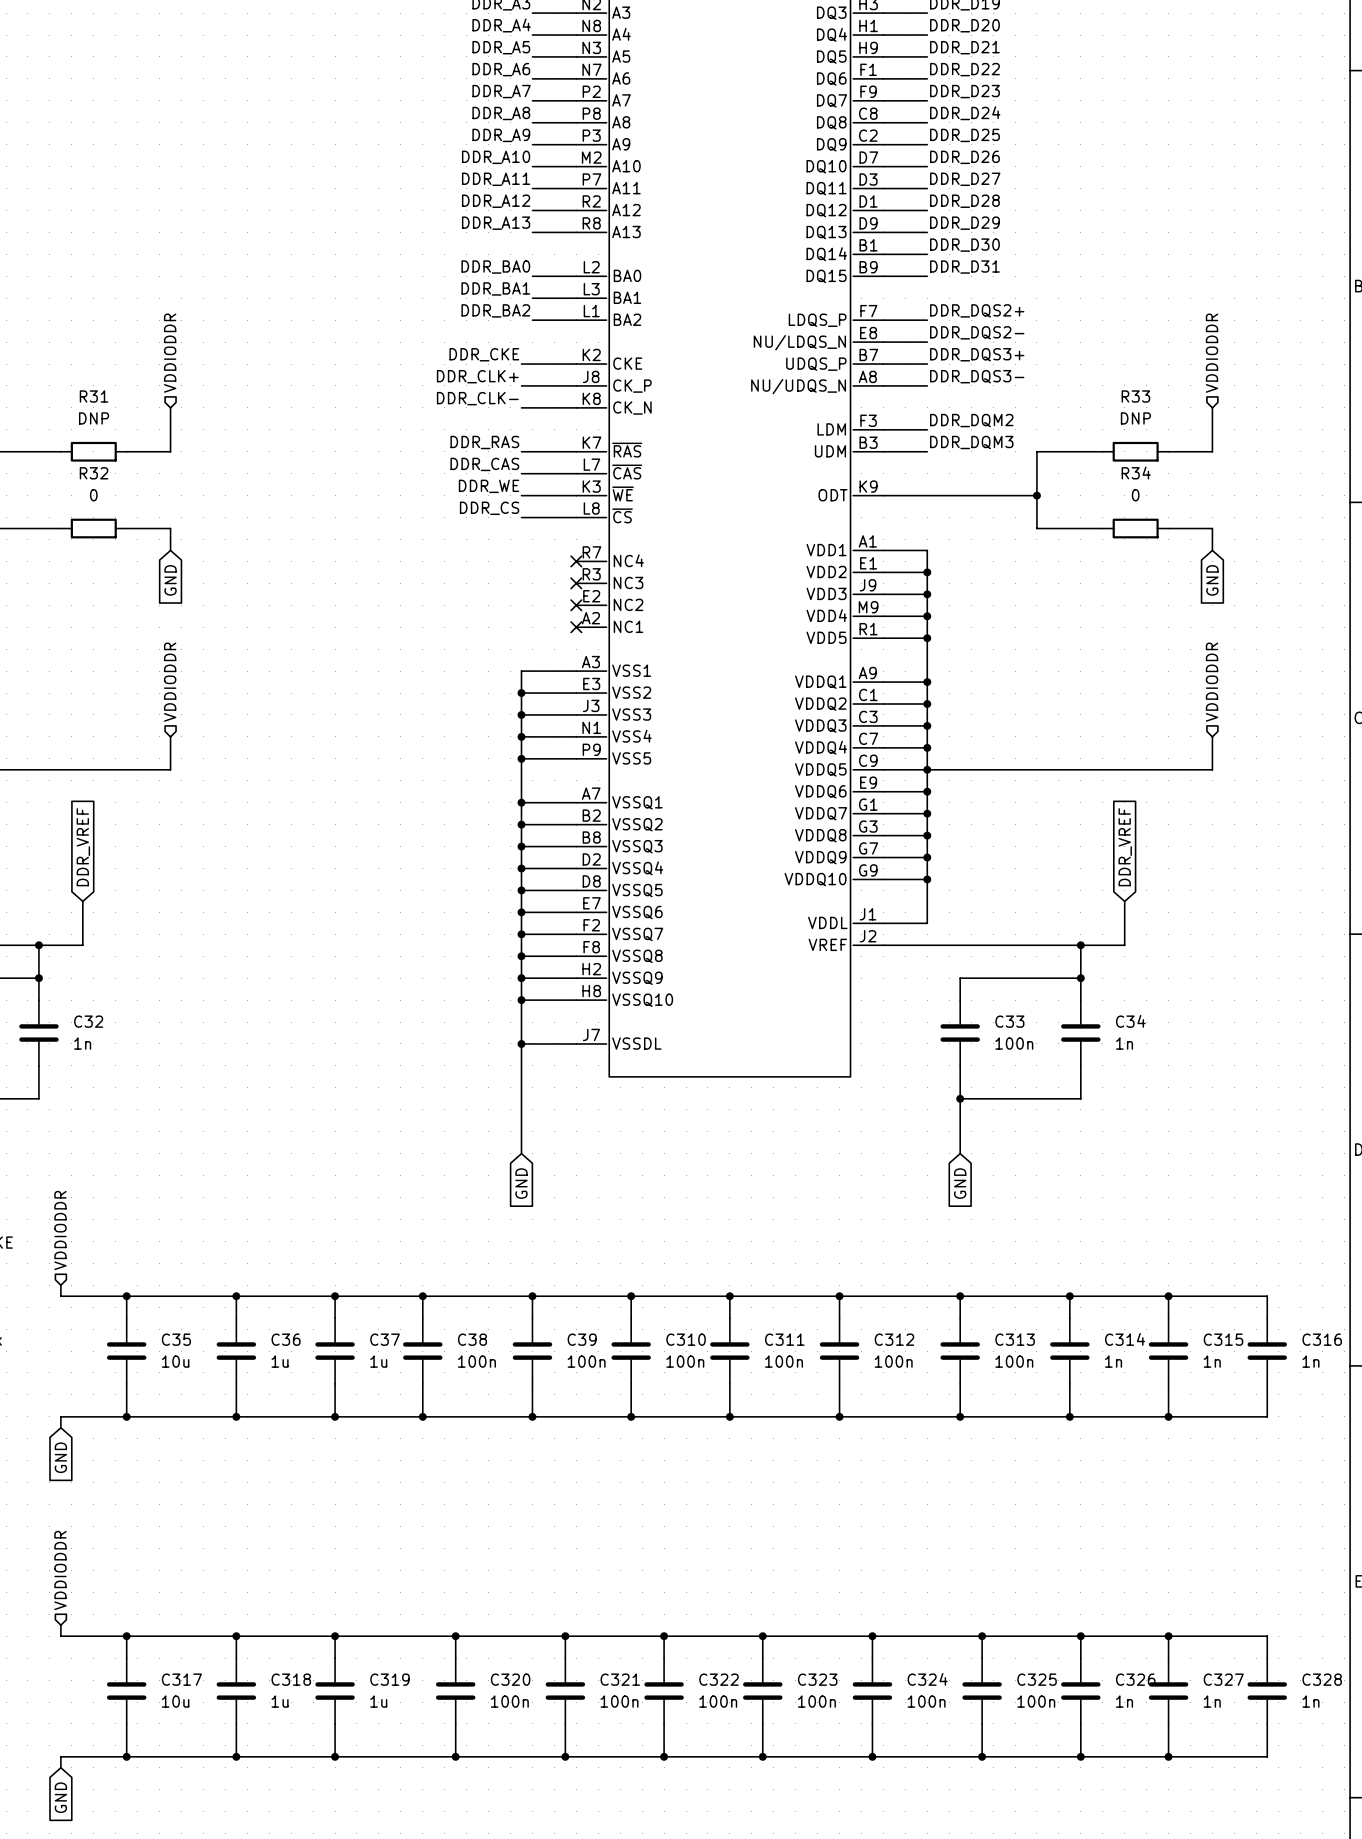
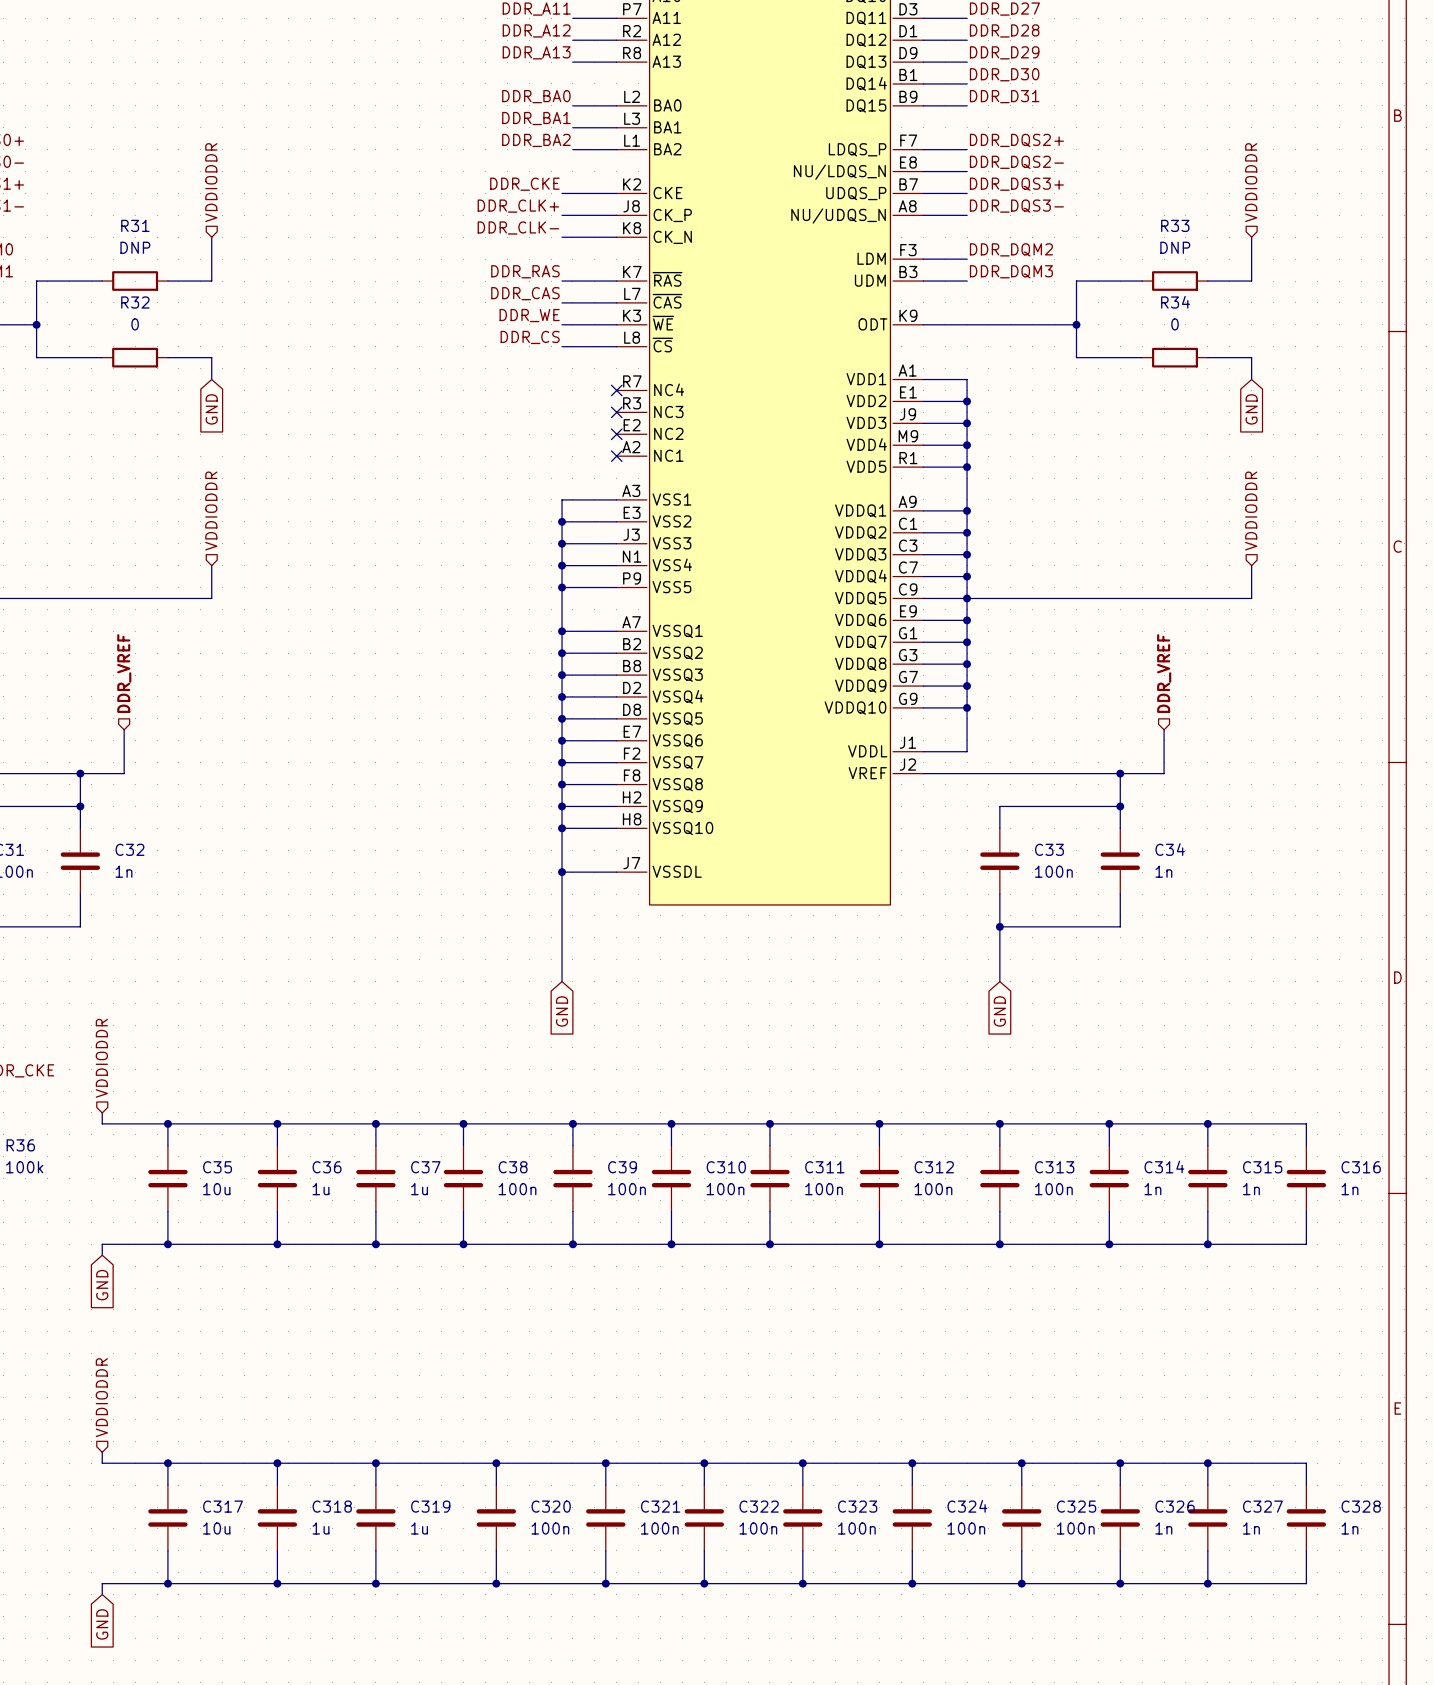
hierarchical label: none -> DDR_VREF (124, 673)
hierarchical label: none -> DDR_VREF (1164, 673)
global label: DDR_VREF (83, 847) -> none
global label: DDR_VREF (1125, 847) -> none

